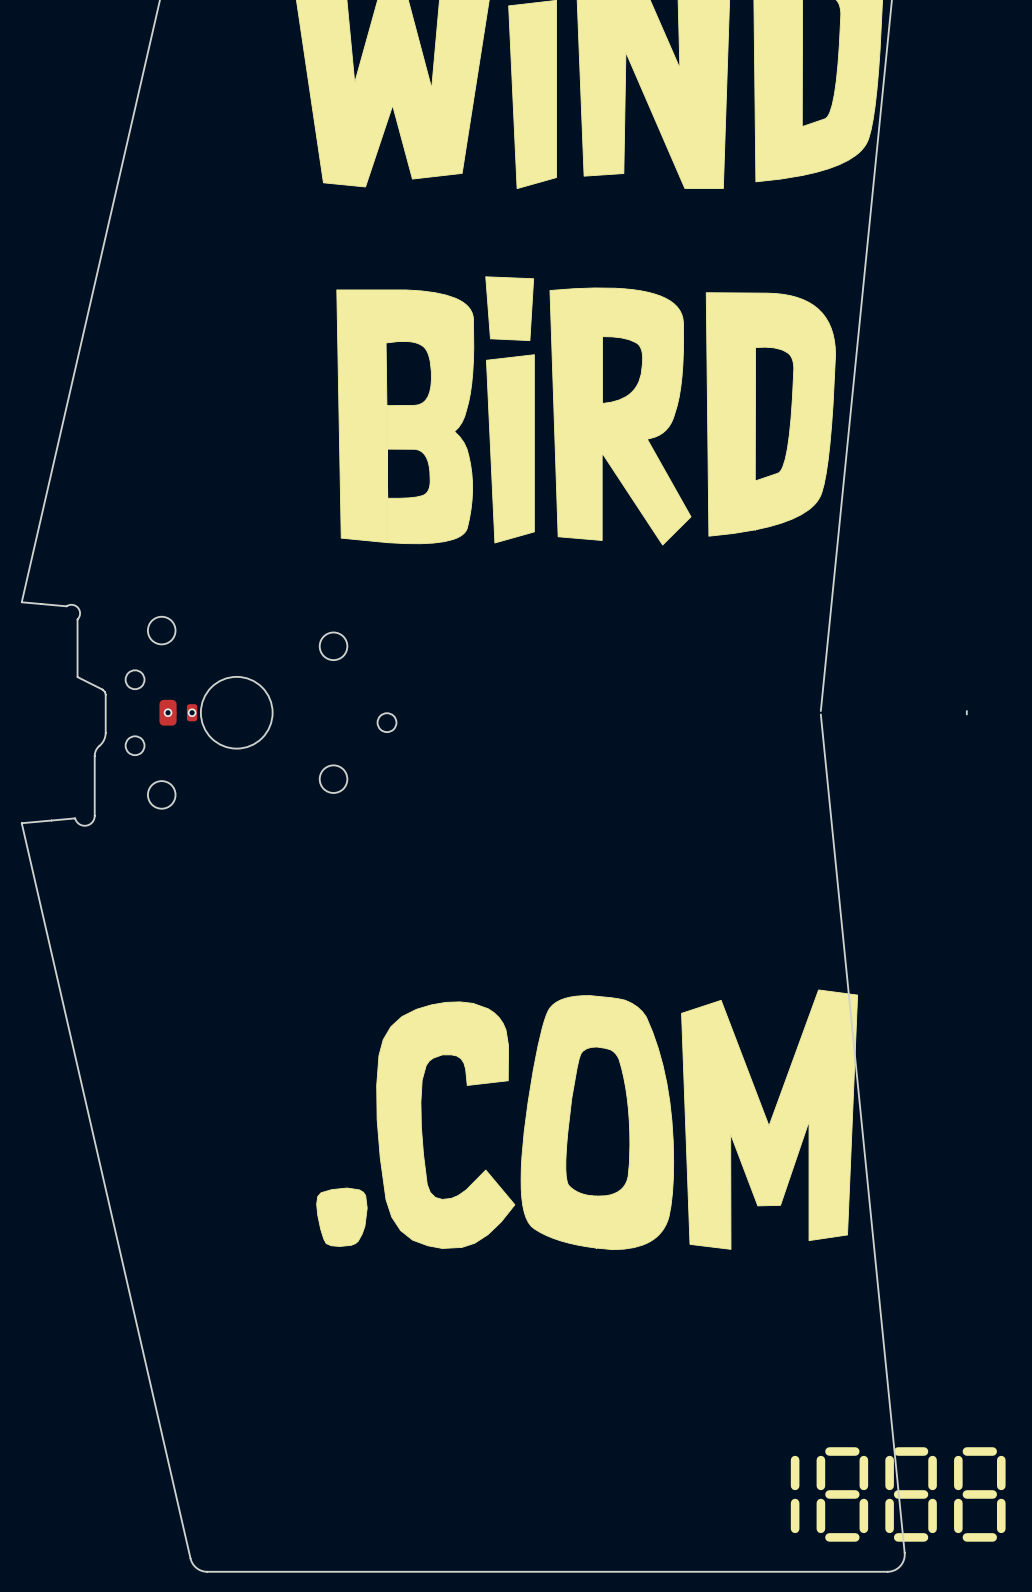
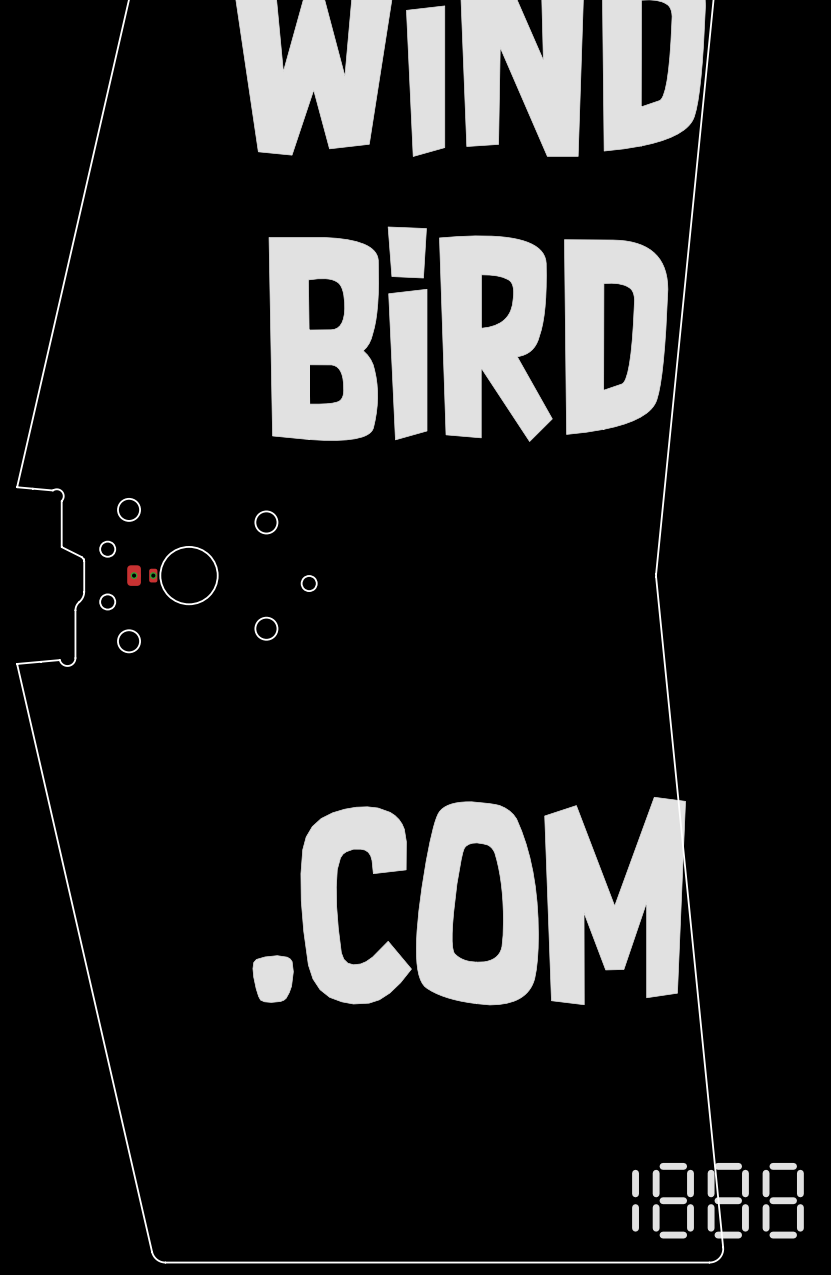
board edge: (966, 711) (966, 714) -> (656, 574) (656, 576)

